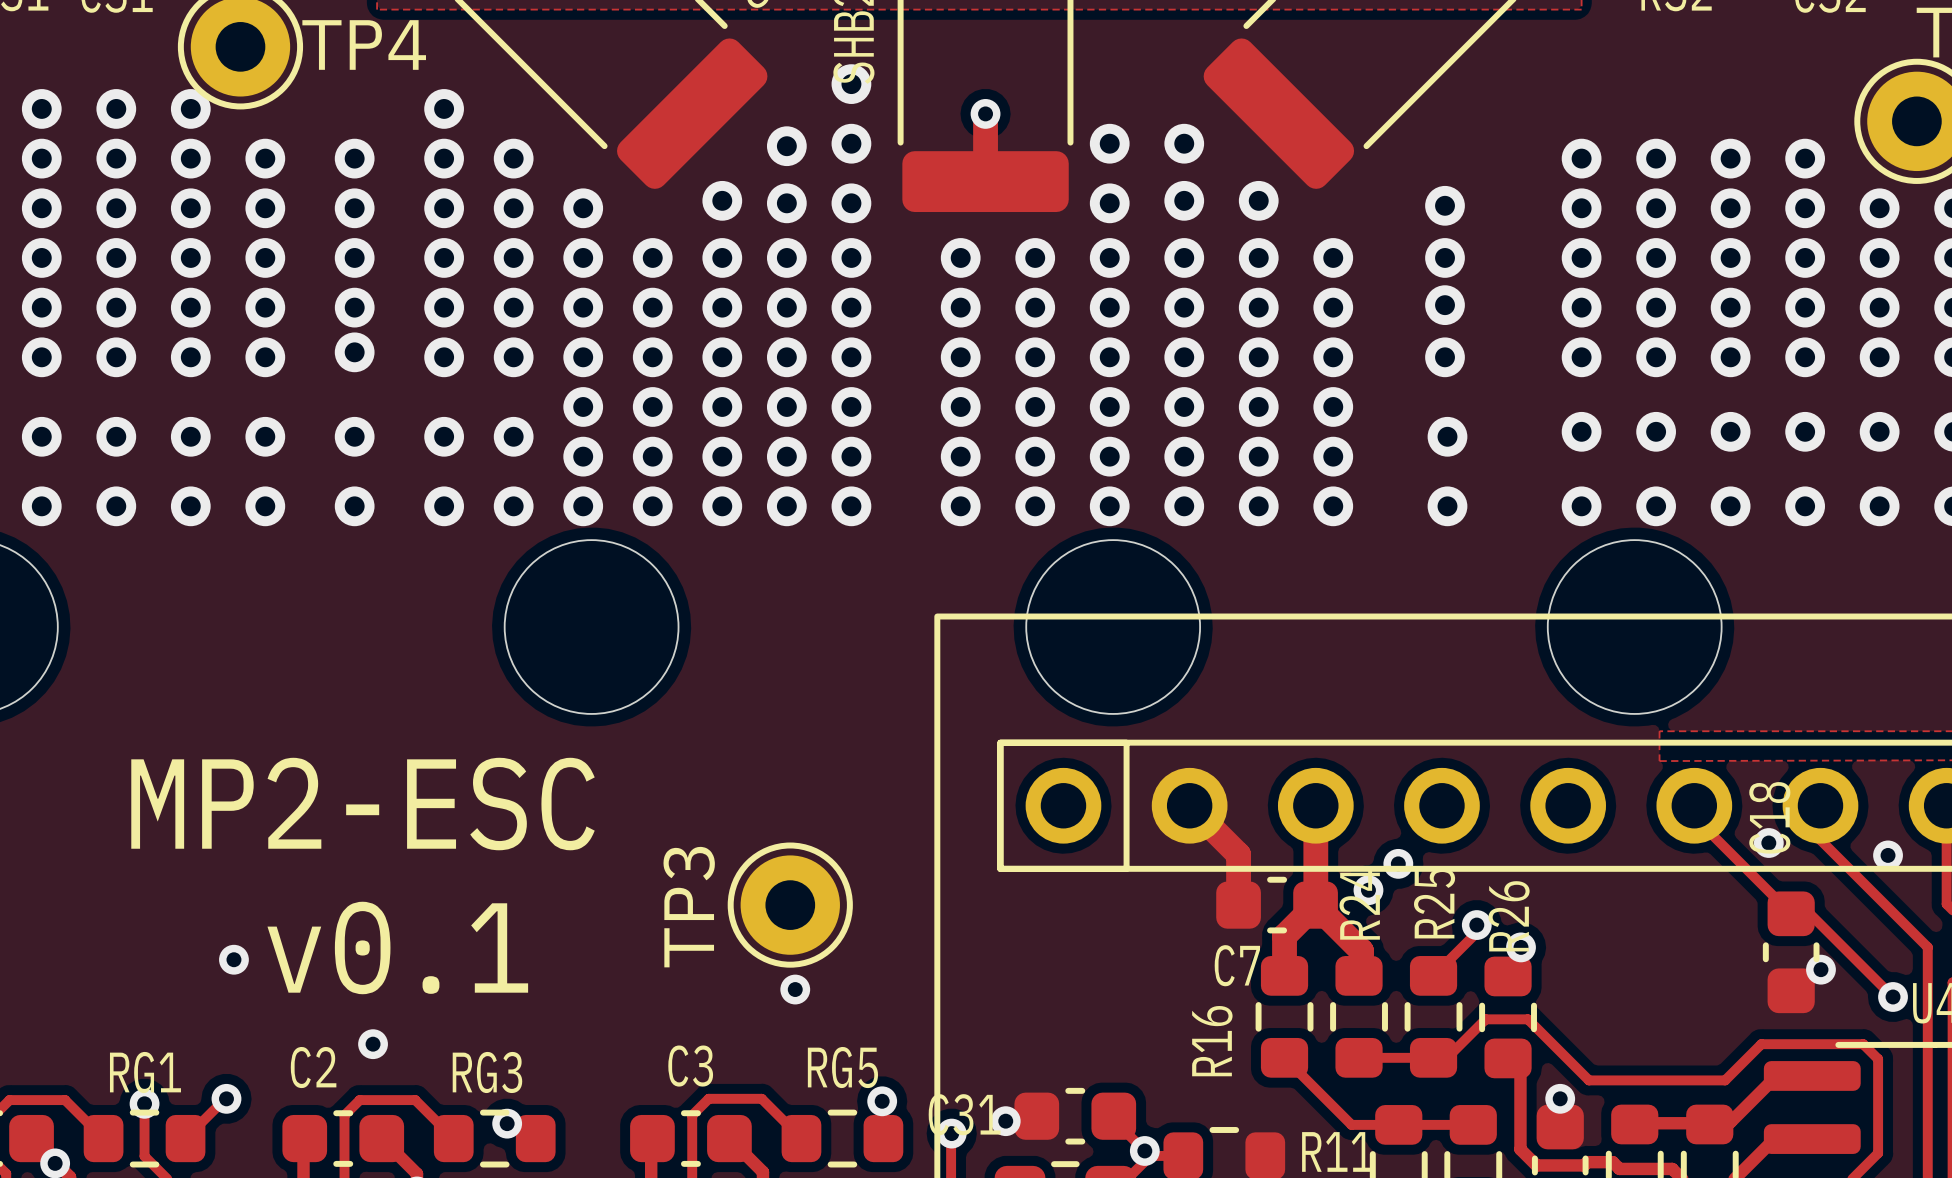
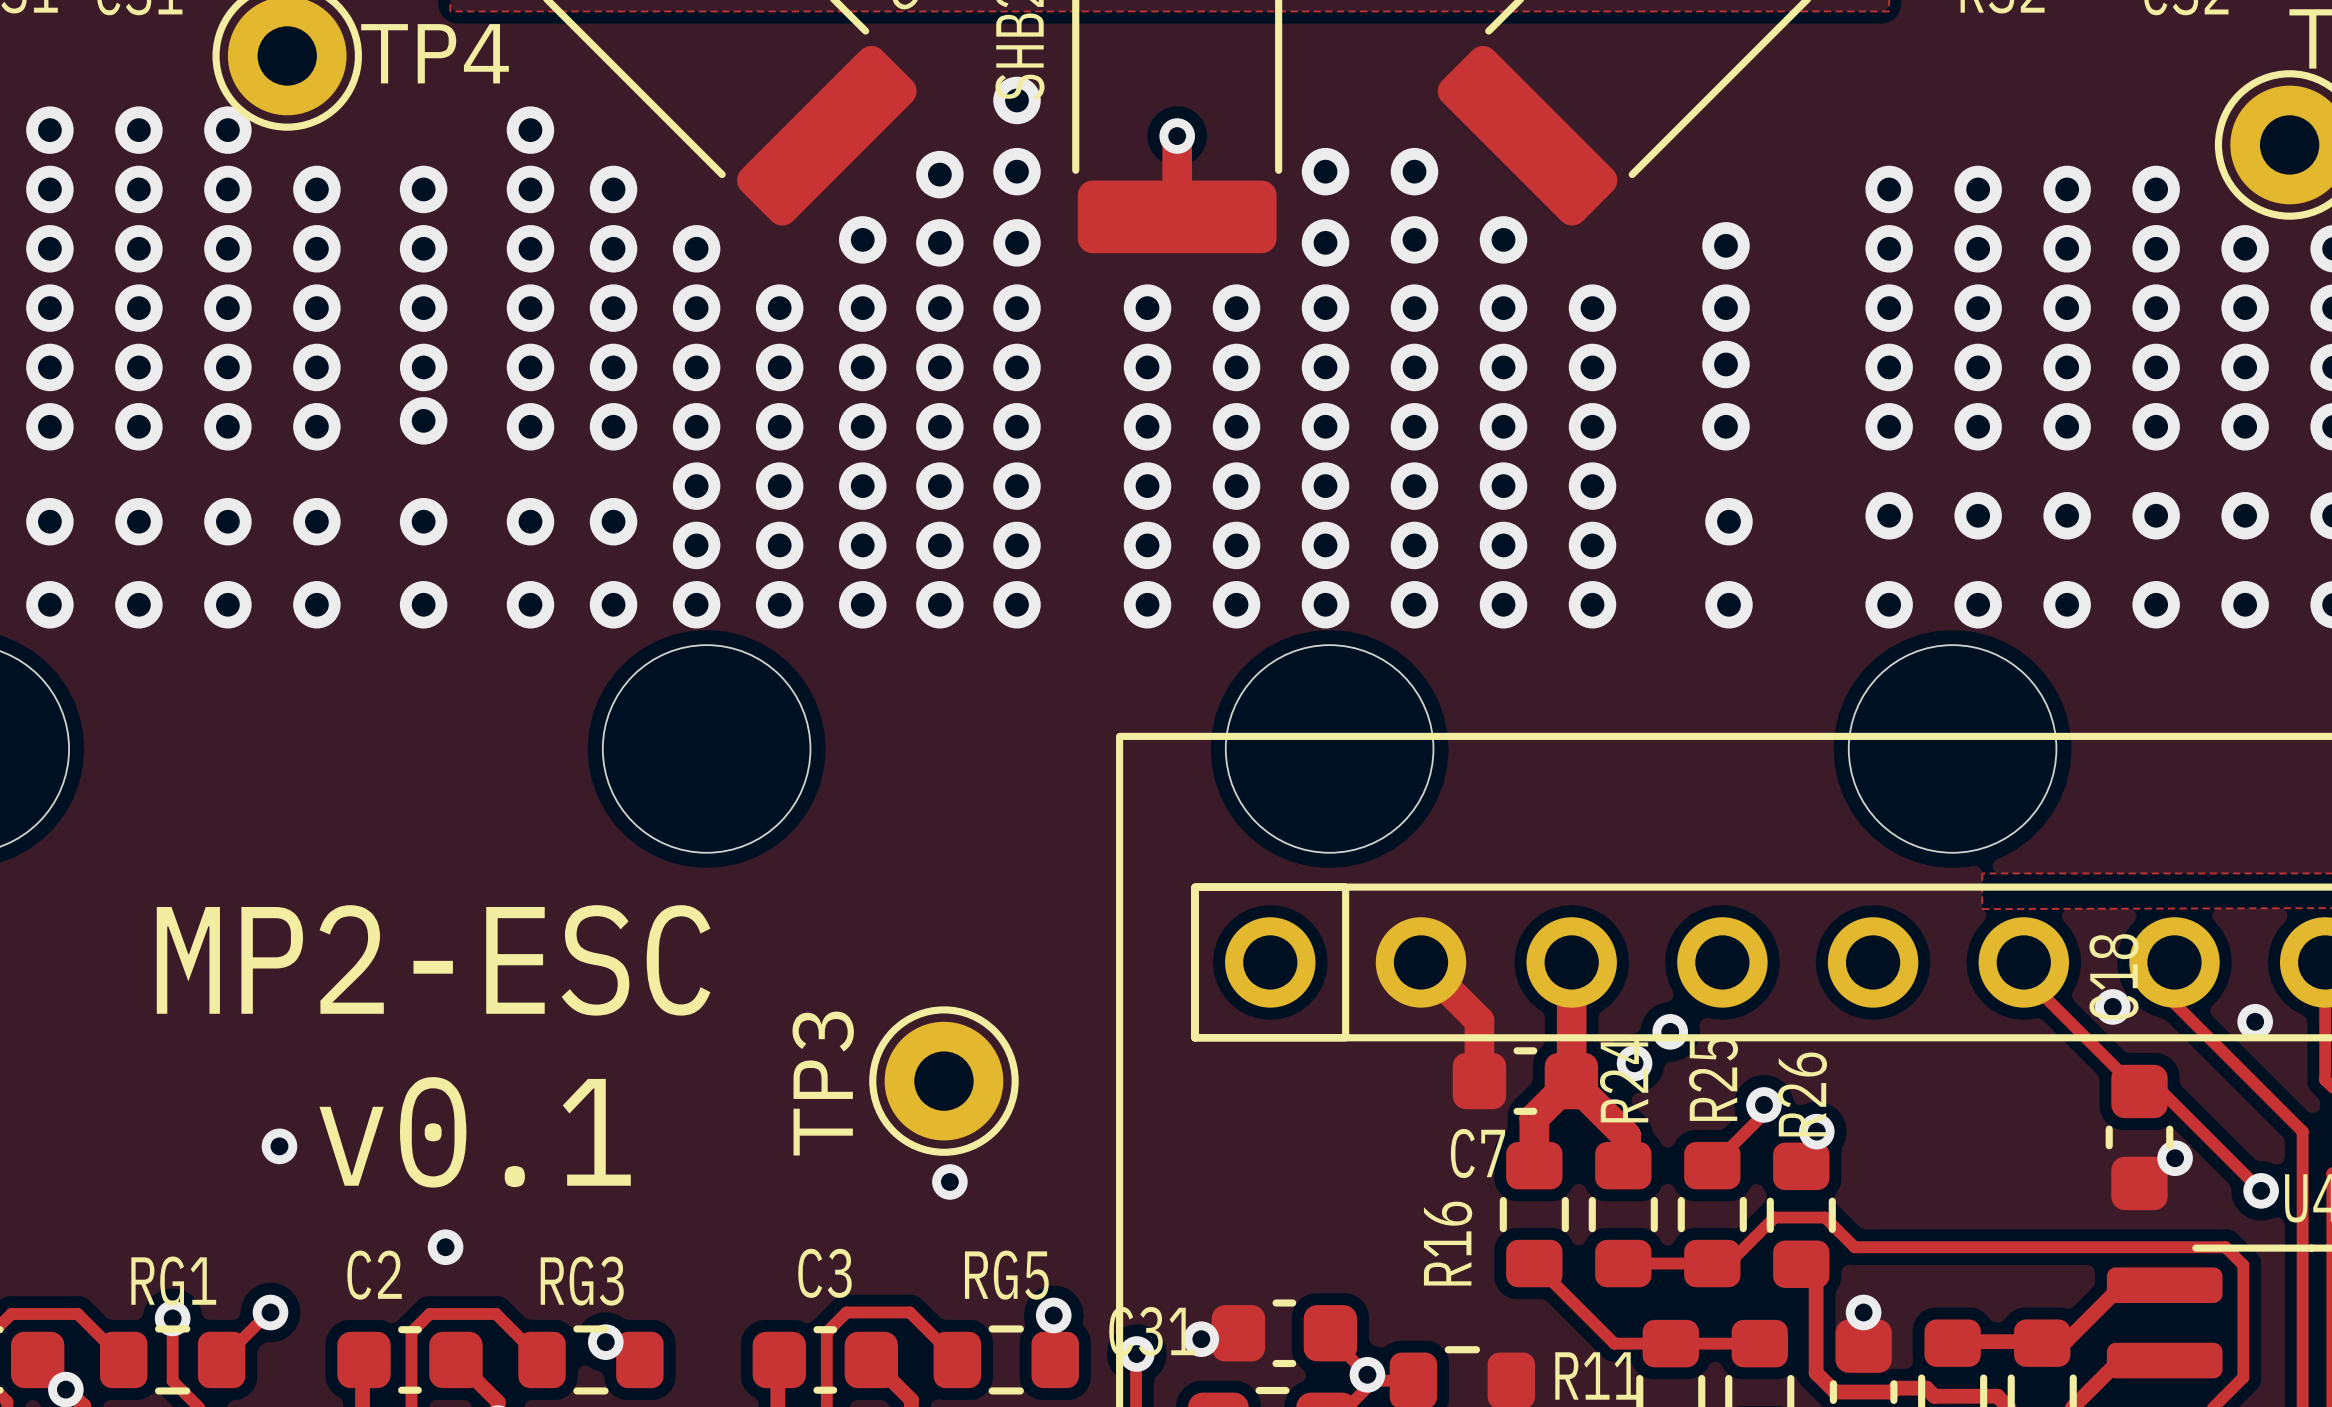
track: (1552, 1044) (1588, 1080) (1725, 1080) (1761, 1044) -> (1854, 1247) (2103, 1247)

